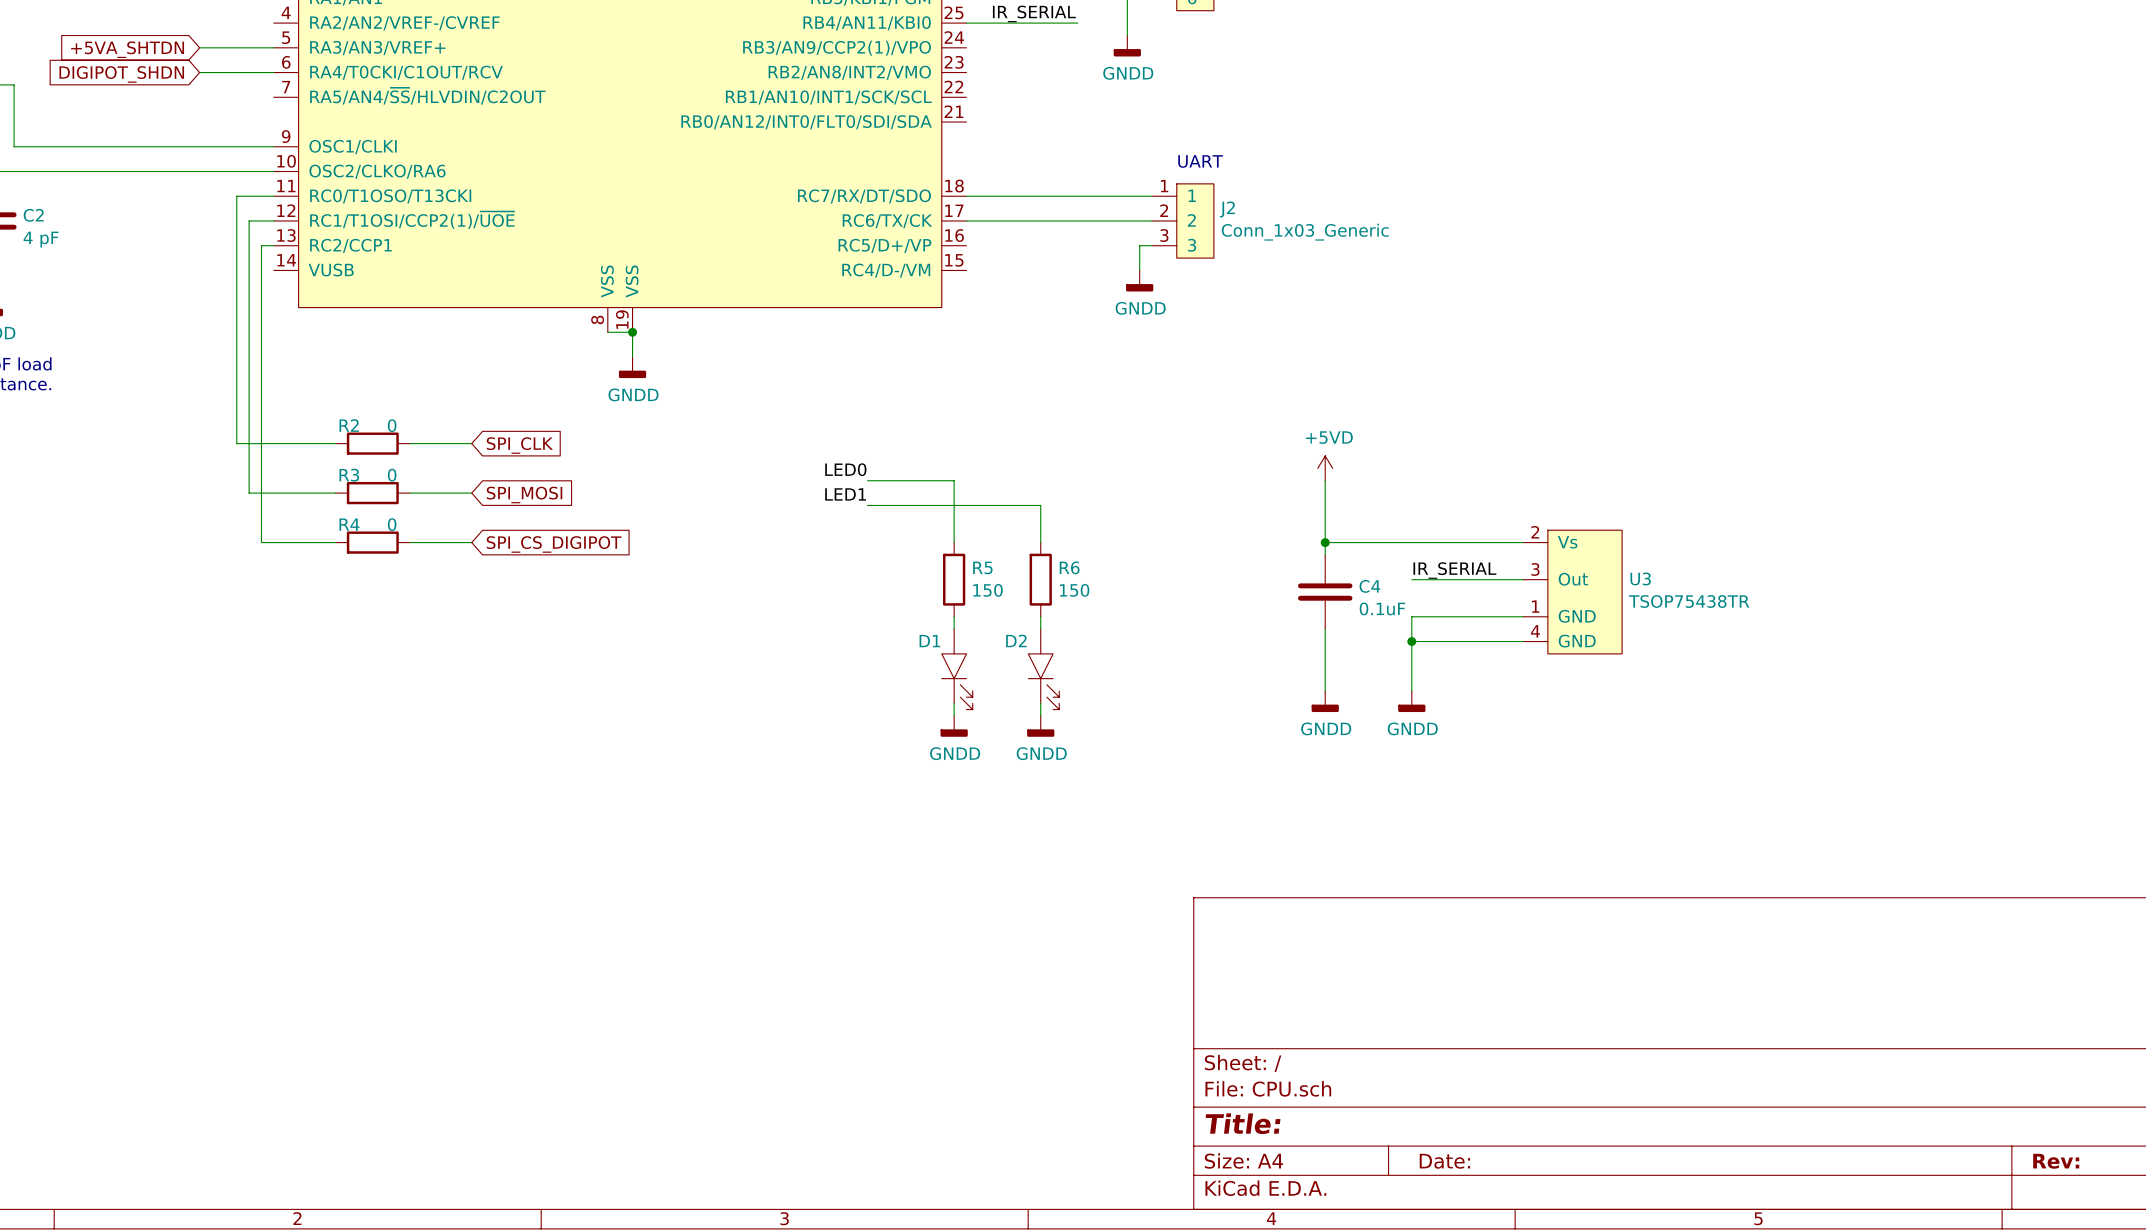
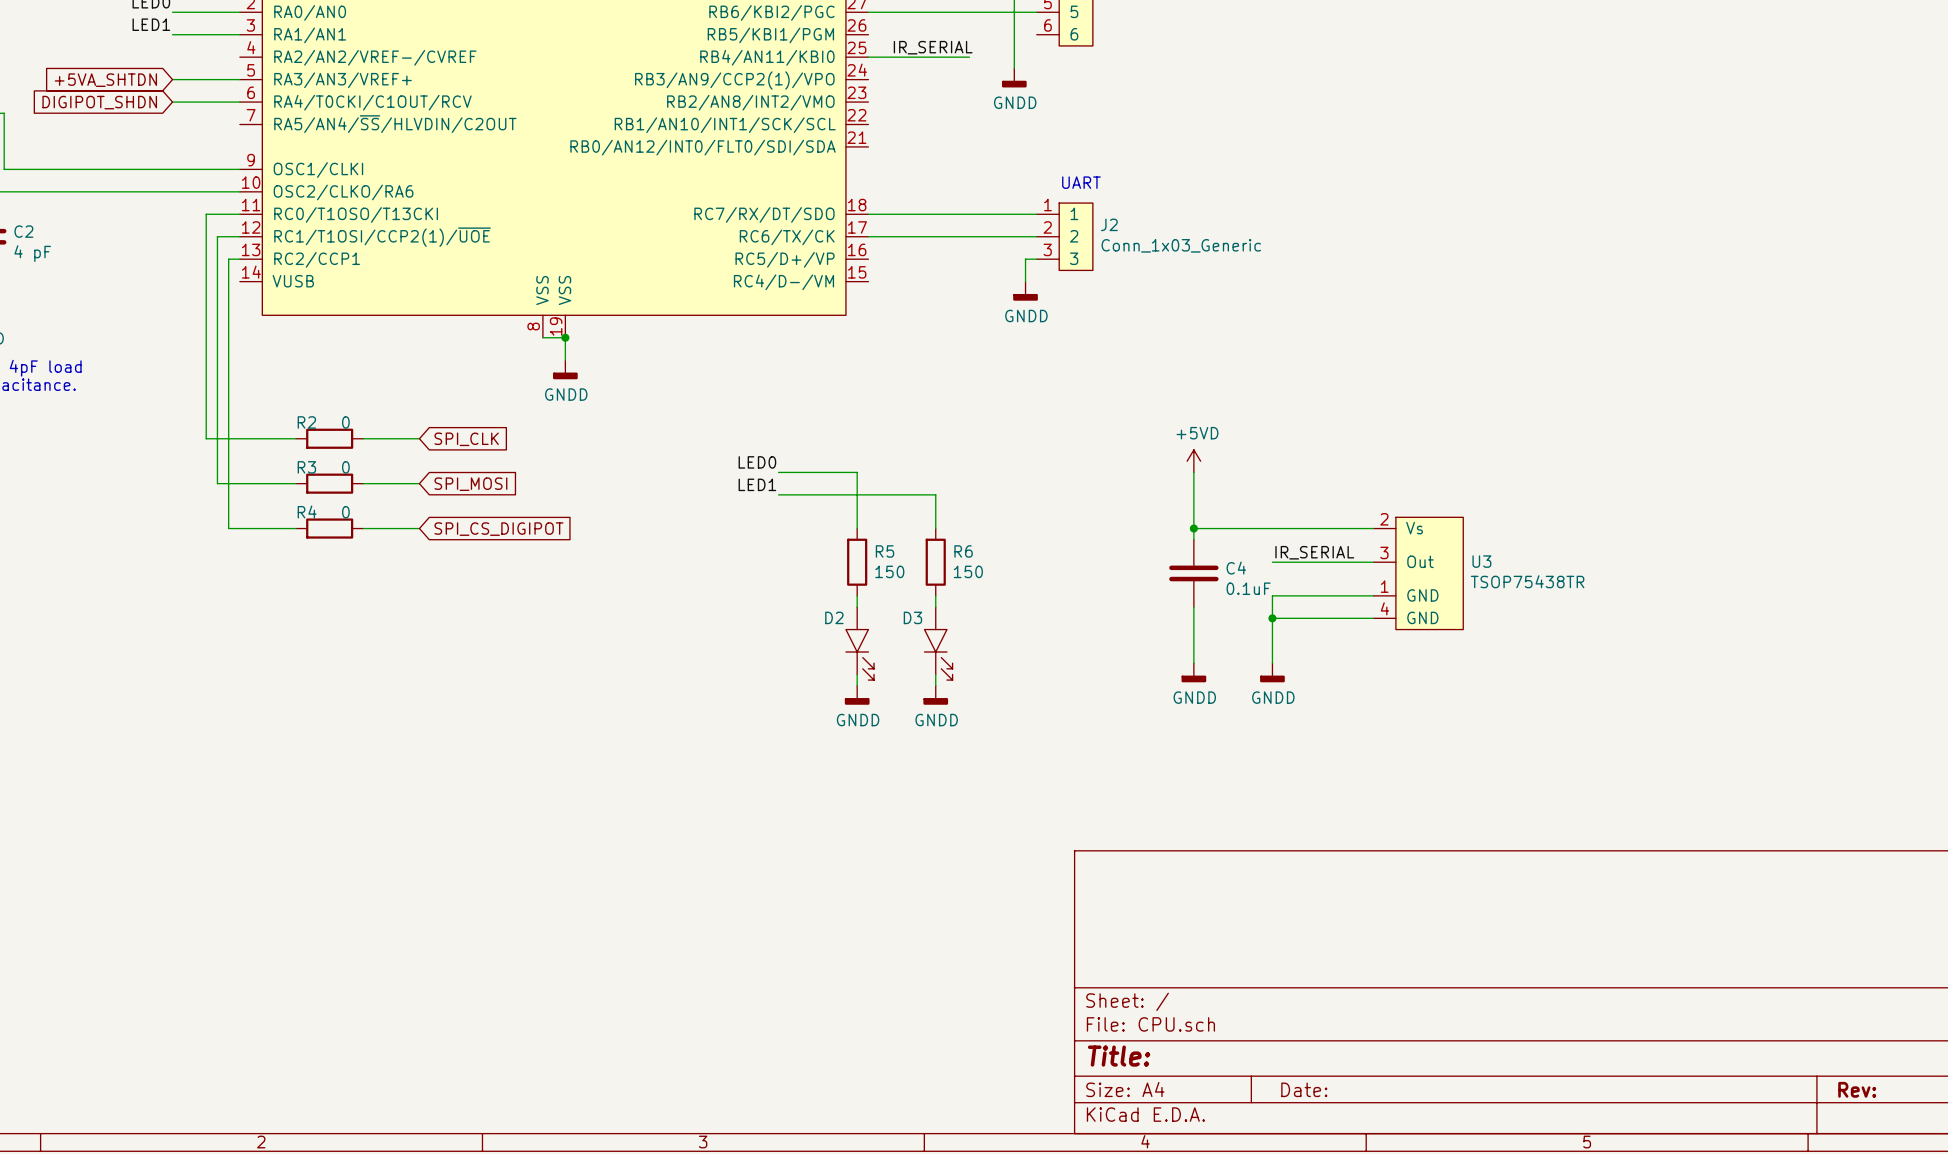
D2 name: D2 (1016, 640) -> D3 (912, 617)
D1 name: D1 (929, 641) -> D2 (834, 617)

